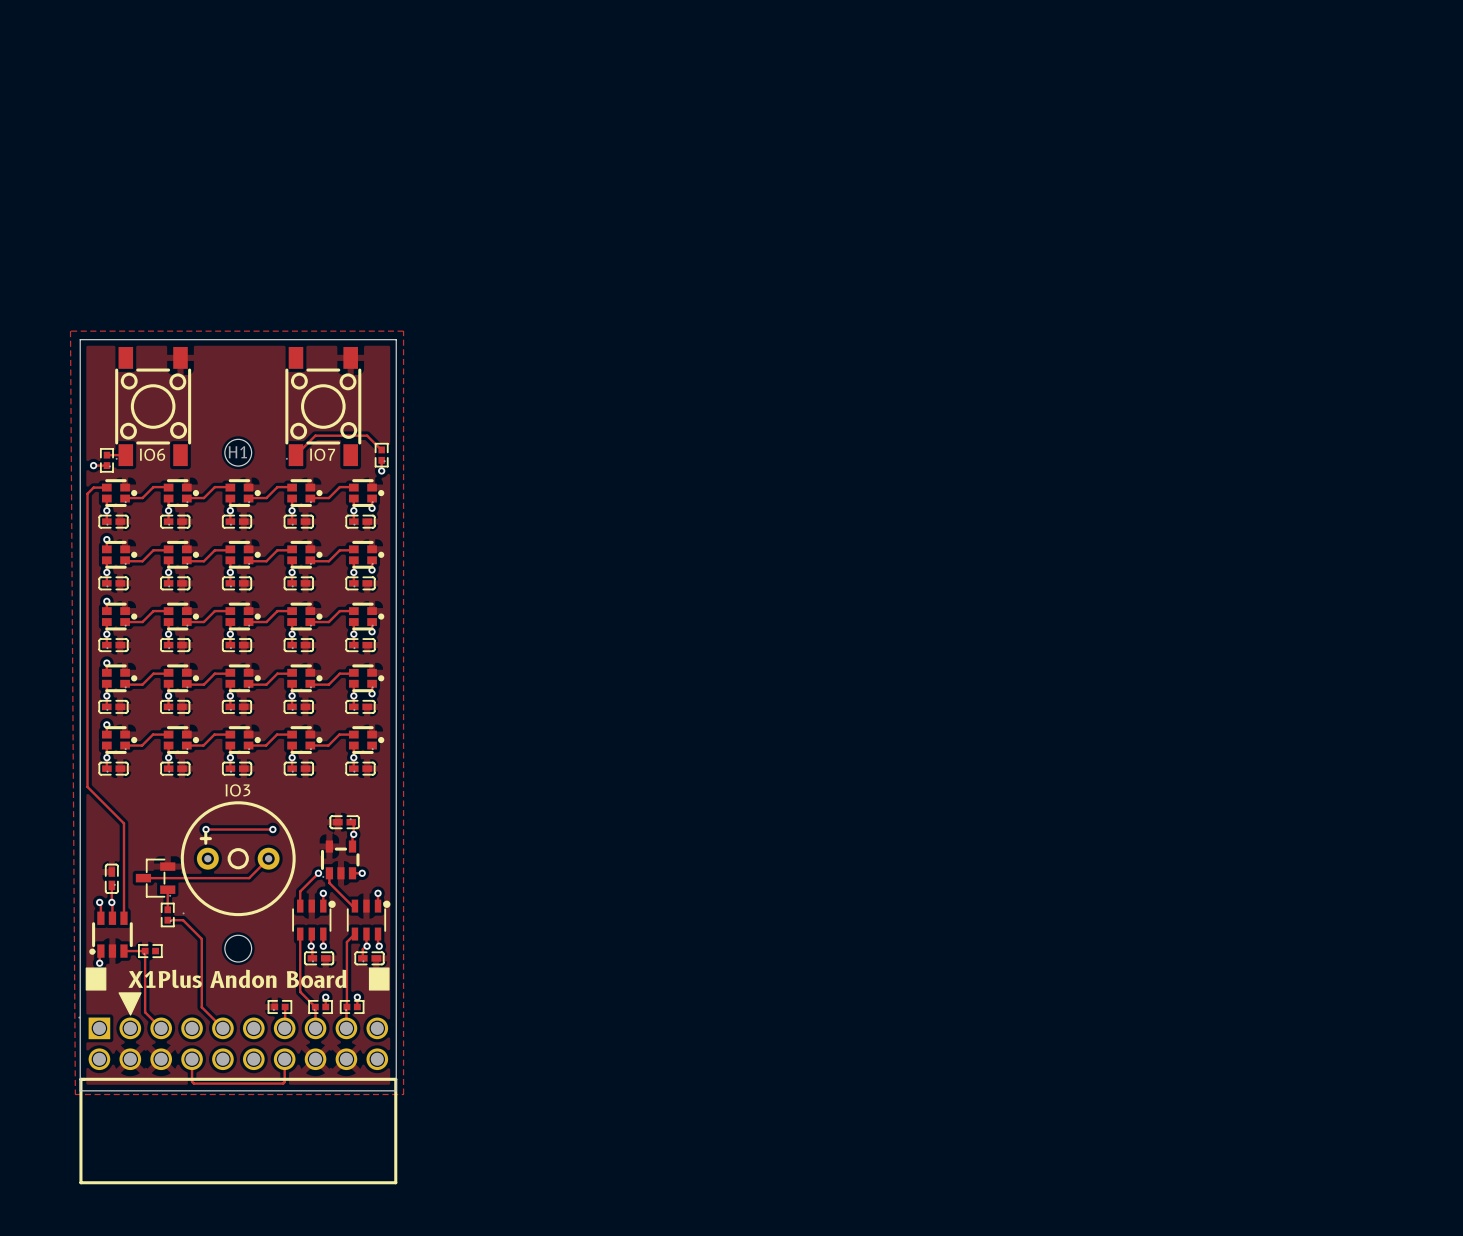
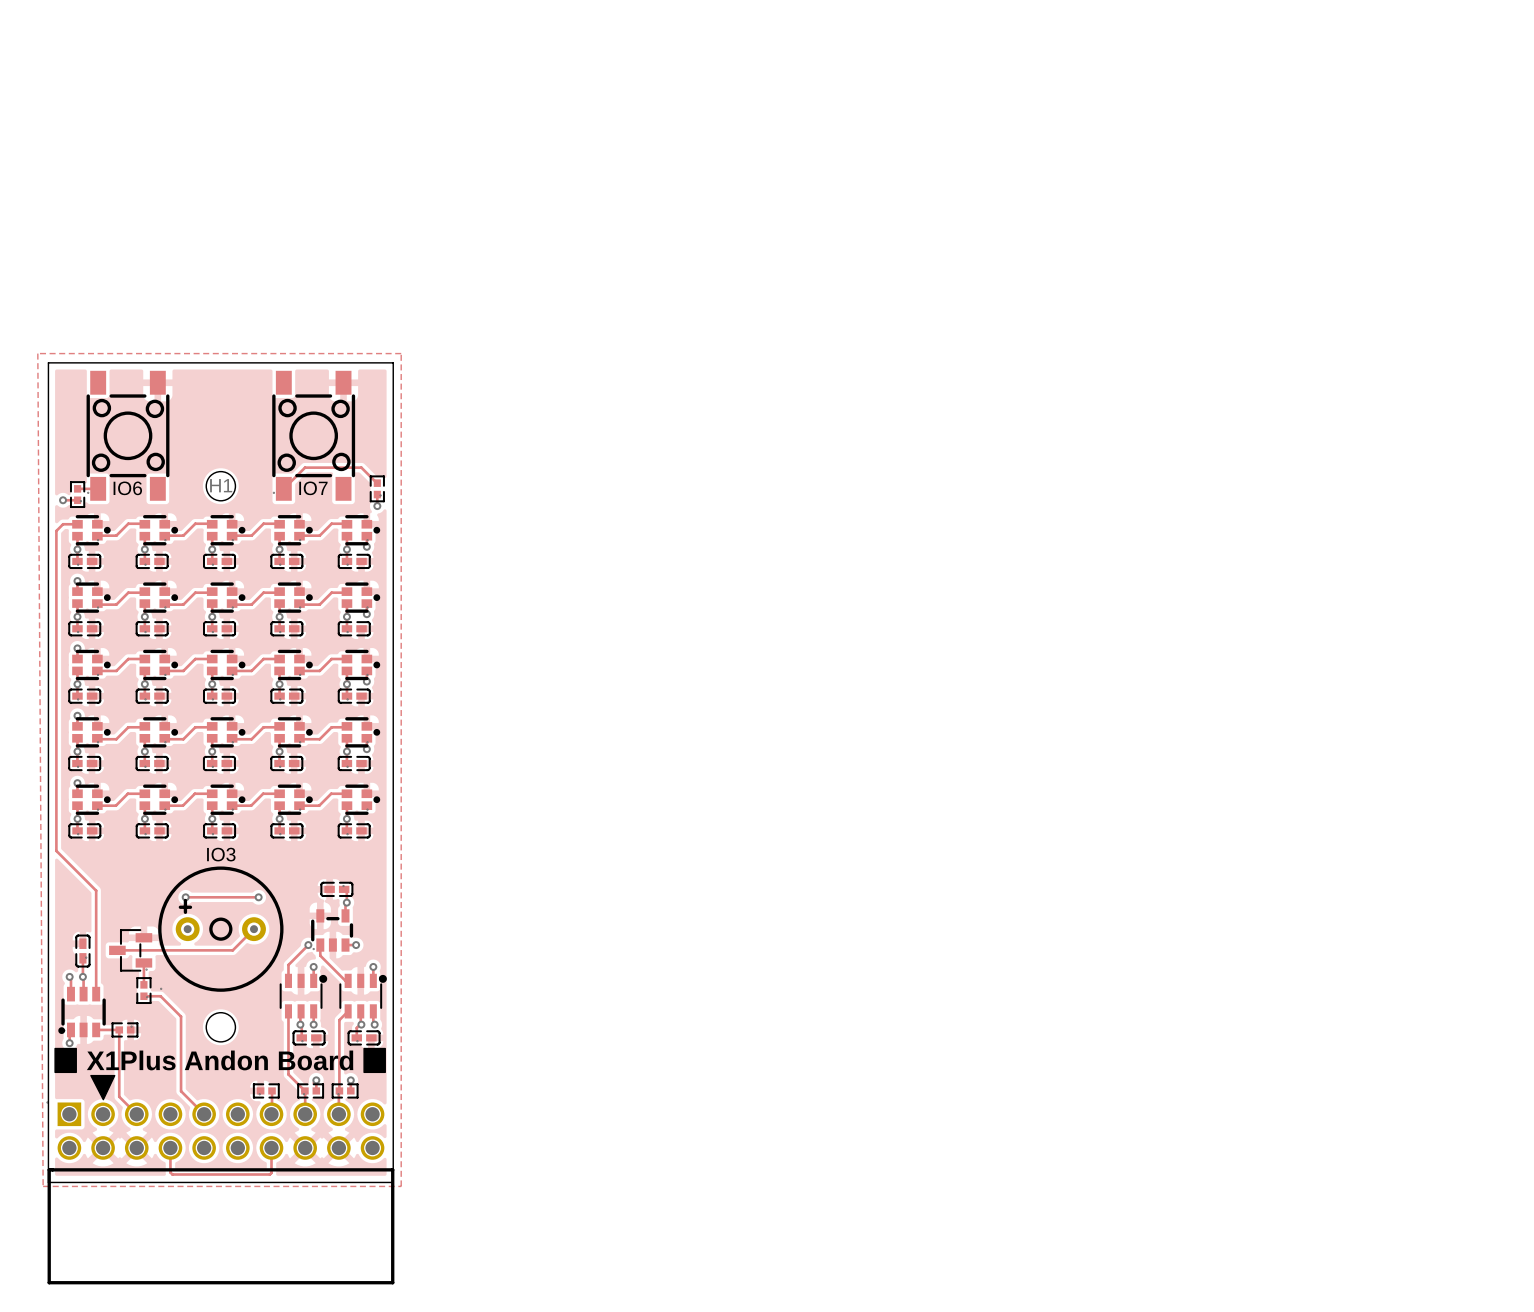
part rotation: 0° (150, 951) -> 180° (124, 1029)

